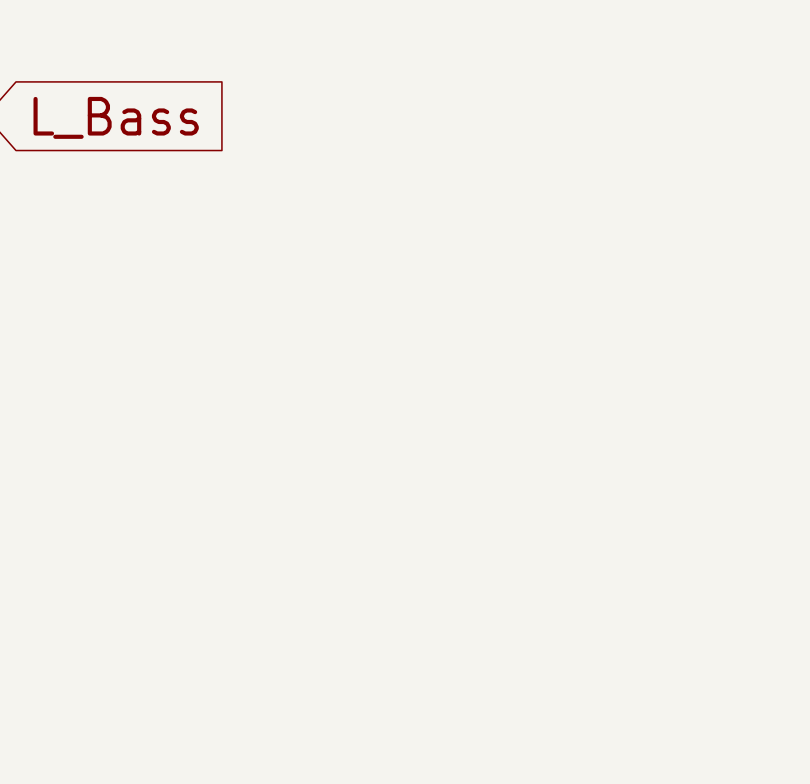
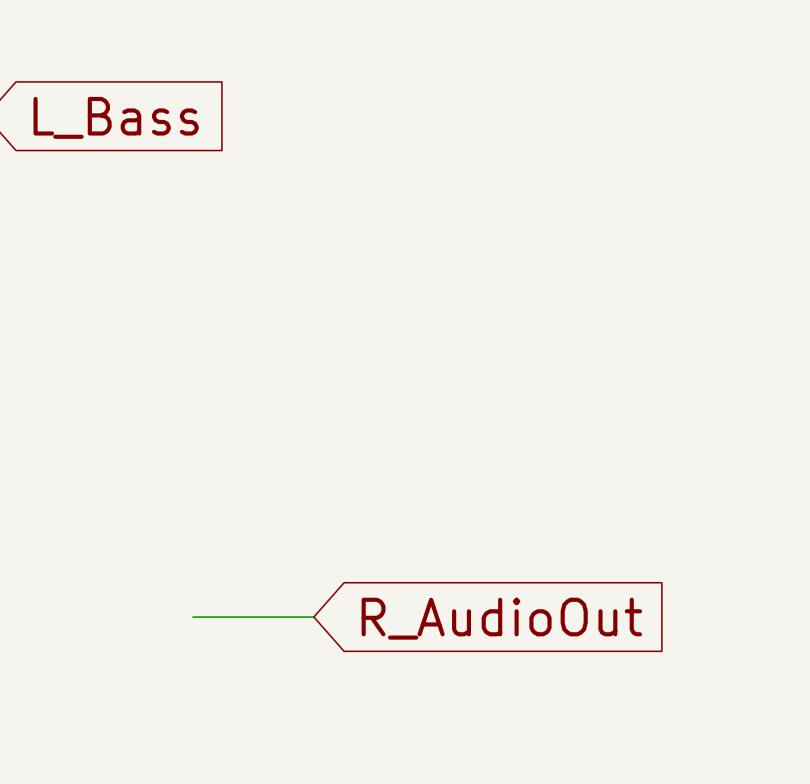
wire: none -> (192, 617) (313, 617)
global label: none -> R_AudioOut (501, 618)

